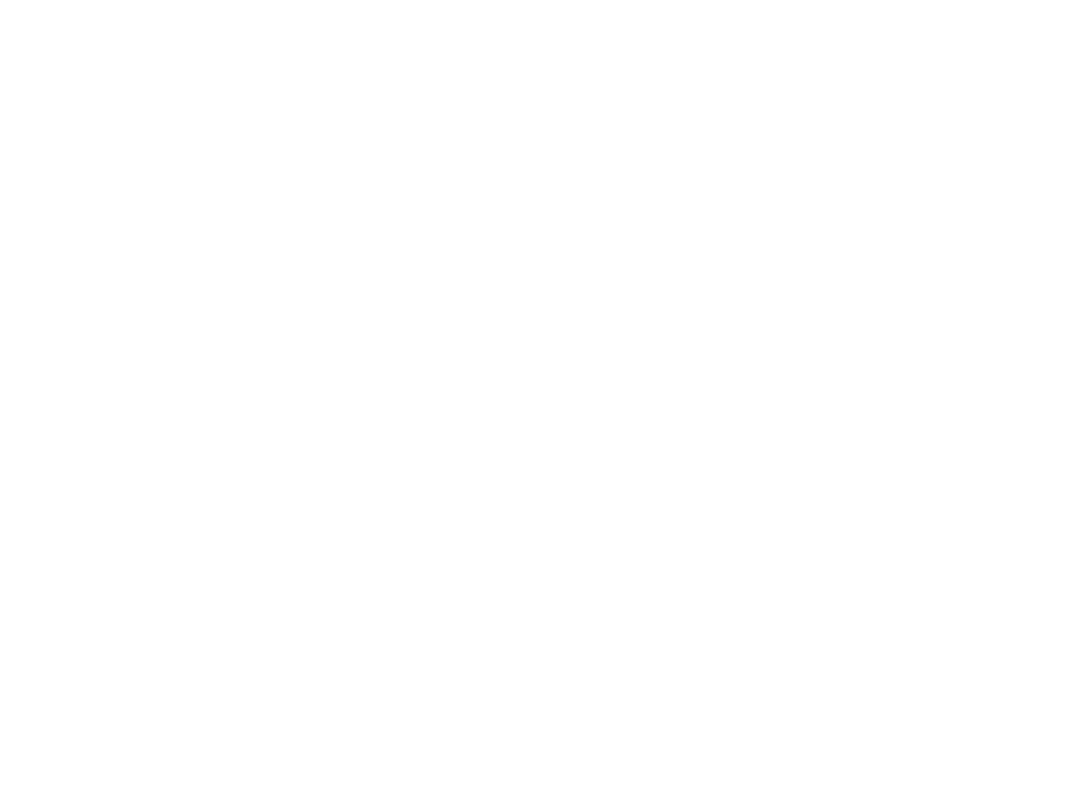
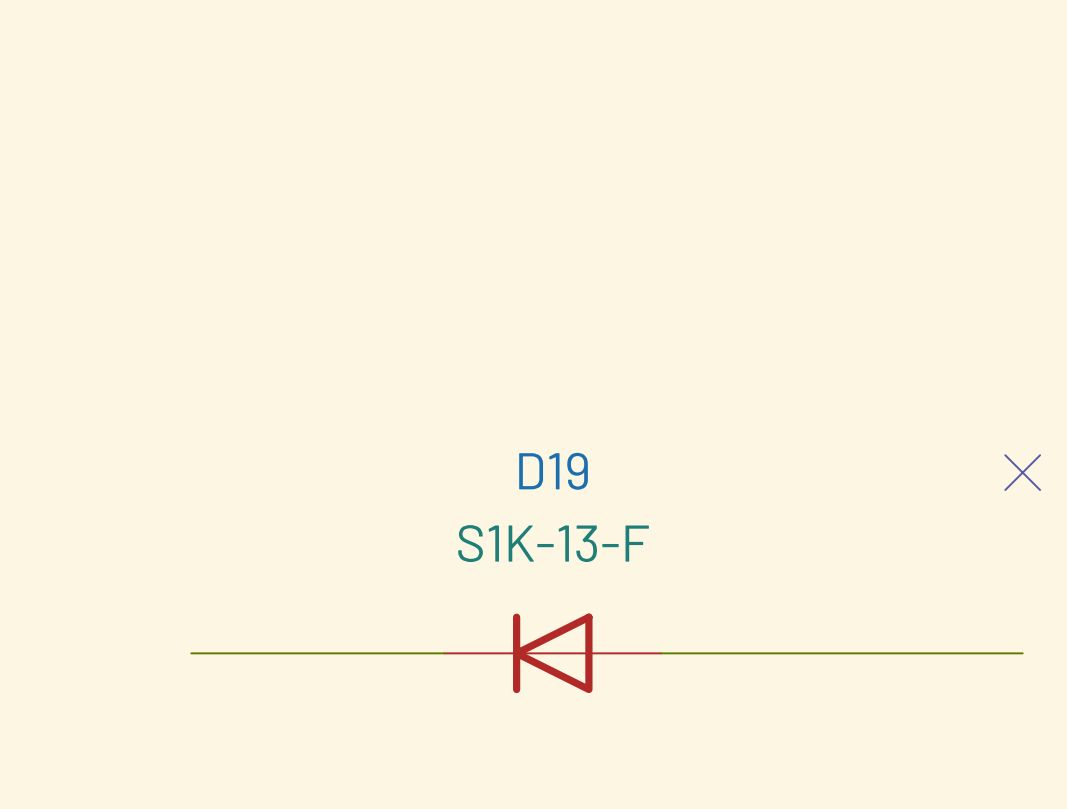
no-connect mark: none -> (1022, 472)
wire: none -> (191, 653) (444, 653)
D19: none -> S1K-13-F (552, 653)
wire: none -> (661, 653) (1022, 653)

